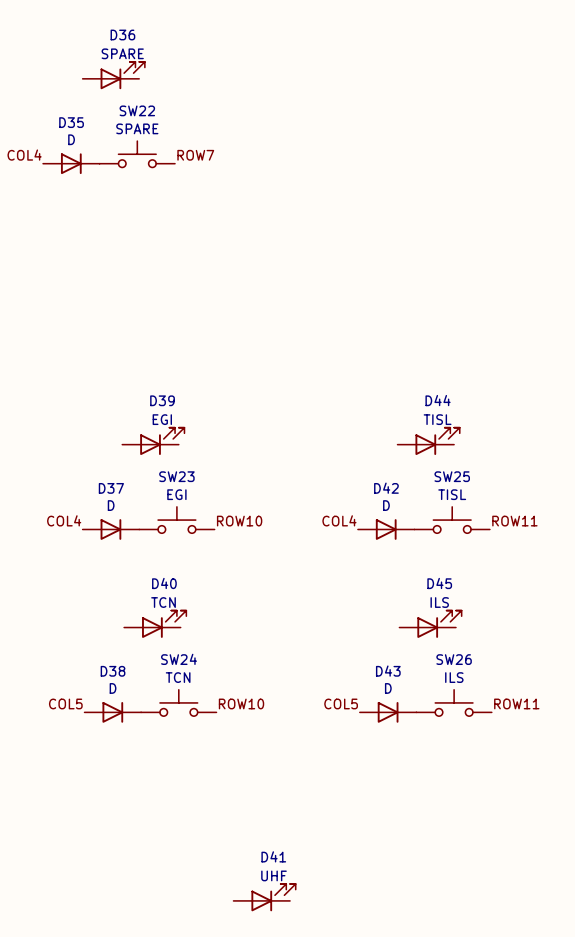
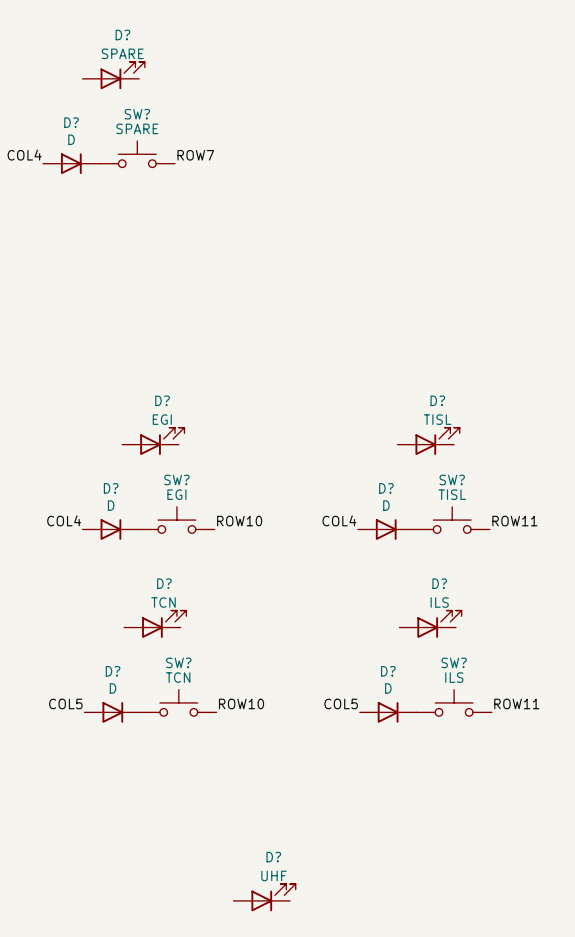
D36 name: D36 (122, 35) -> D? (122, 35)
SW22 name: SW22 (137, 110) -> SW? (137, 114)
D35 name: D35 (71, 122) -> D? (71, 122)
D39 name: D39 (162, 400) -> D? (162, 400)
D44 name: D44 (438, 400) -> D? (437, 400)
SW23 name: SW23 (176, 476) -> SW? (176, 479)
SW25 name: SW25 (452, 476) -> SW? (452, 479)
D37 name: D37 (111, 488) -> D? (111, 488)
D42 name: D42 (386, 488) -> D? (386, 488)
D40 name: D40 (164, 583) -> D? (164, 583)
D45 name: D45 (439, 583) -> D? (439, 583)
SW24 name: SW24 (179, 659) -> SW? (178, 662)
SW26 name: SW26 (454, 659) -> SW? (454, 662)
D38 name: D38 (113, 671) -> D? (113, 671)
D43 name: D43 (388, 671) -> D? (388, 671)
D41 name: D41 (273, 856) -> D? (273, 857)

